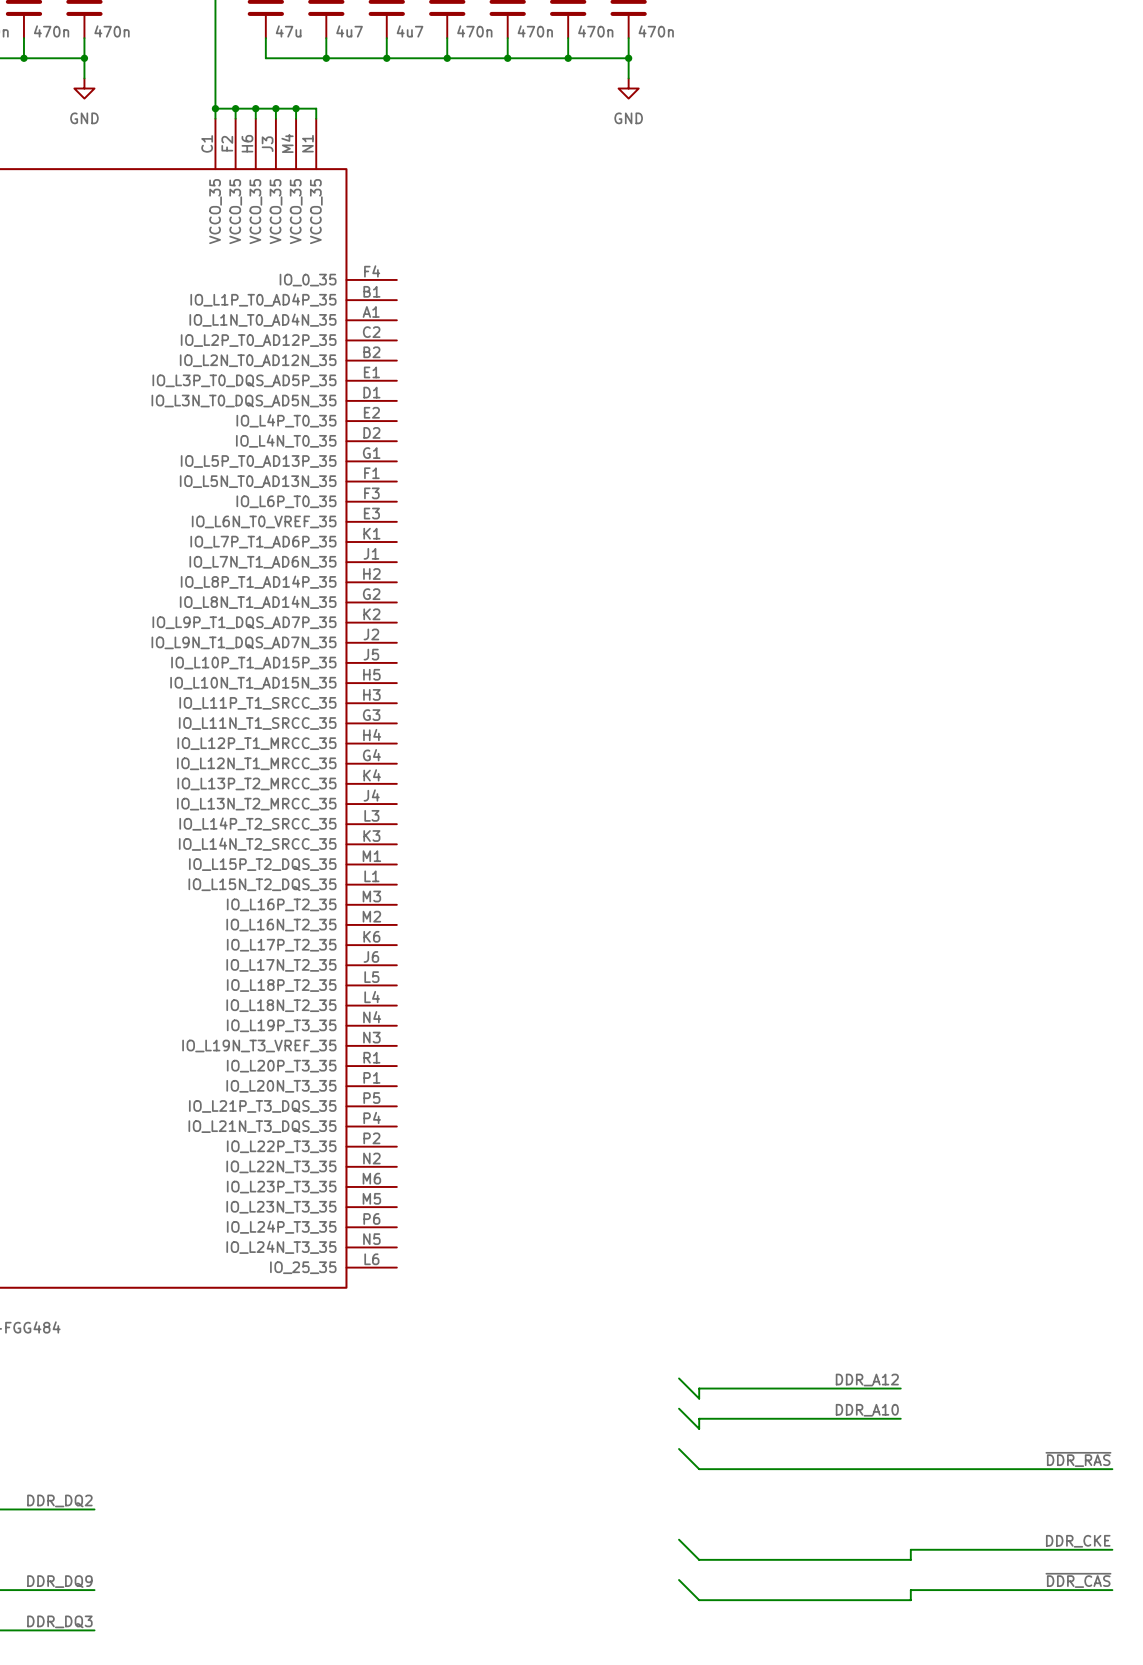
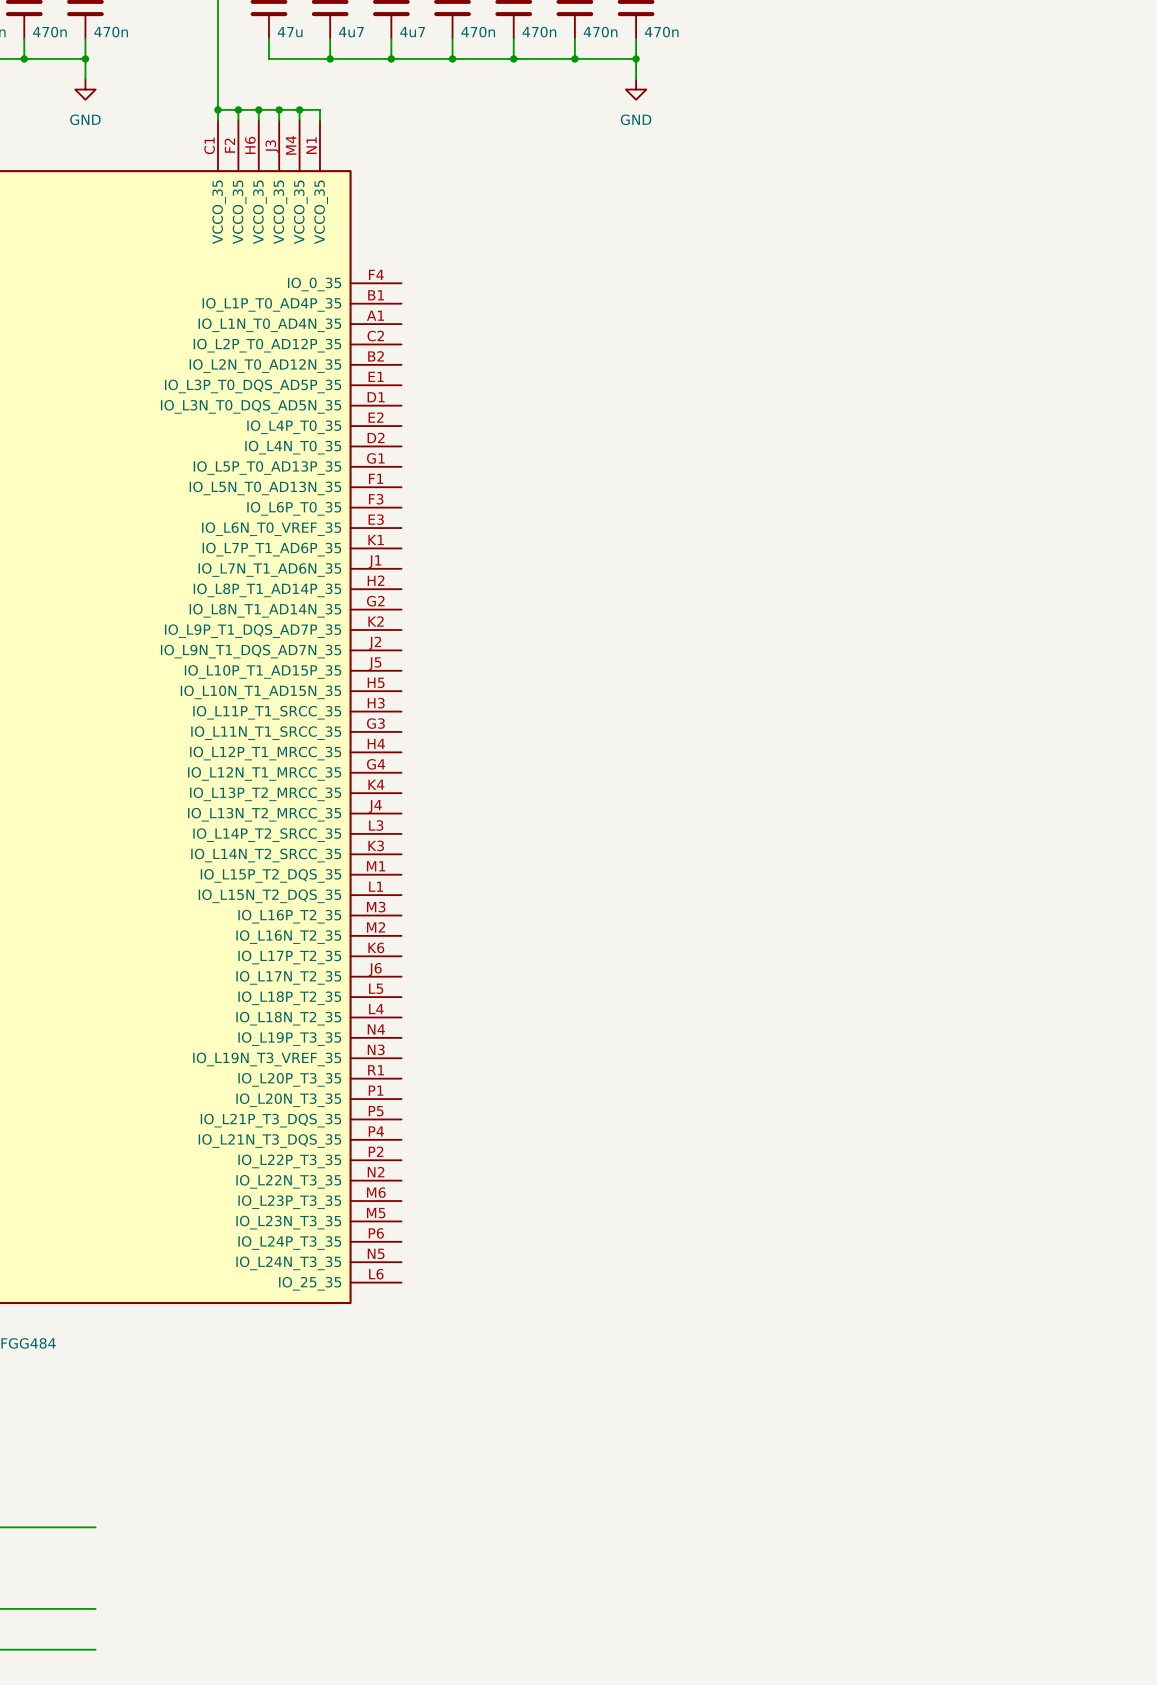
wire: (679, 1378) (699, 1398) (699, 1388) (900, 1388) -> none
label: DDR_A12 (867, 1380) -> none
wire: (679, 1408) (699, 1428) (699, 1418) (900, 1418) -> none
label: DDR_A10 (867, 1410) -> none
wire: (679, 1449) (699, 1469) (1112, 1469) -> none
label: ~{DDR_RAS} (1078, 1459) -> none
label: DDR_DQ2 (59, 1500) -> none
wire: (679, 1539) (699, 1559) (910, 1559) (910, 1549) (1112, 1549) -> none
label: DDR_CKE (1078, 1541) -> none
wire: (679, 1580) (699, 1600) (910, 1600) (910, 1590) (1112, 1590) -> none
label: ~{DDR_CAS} (1078, 1580) -> none
label: DDR_DQ9 (59, 1581) -> none
label: DDR_DQ3 (59, 1621) -> none

